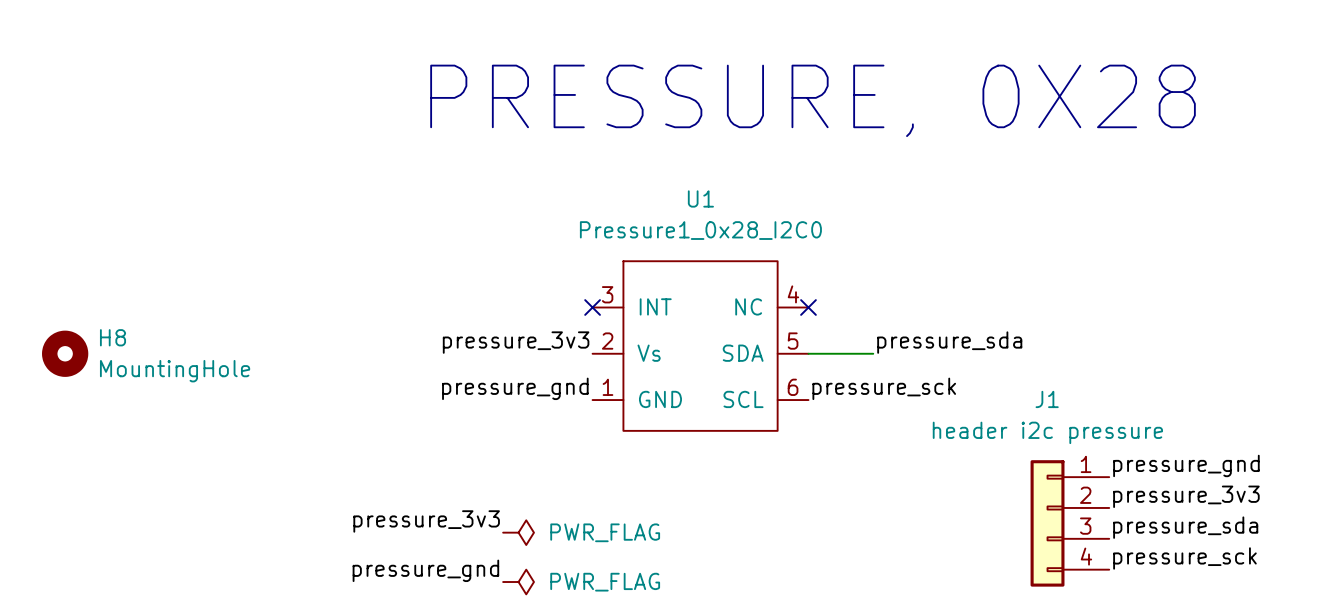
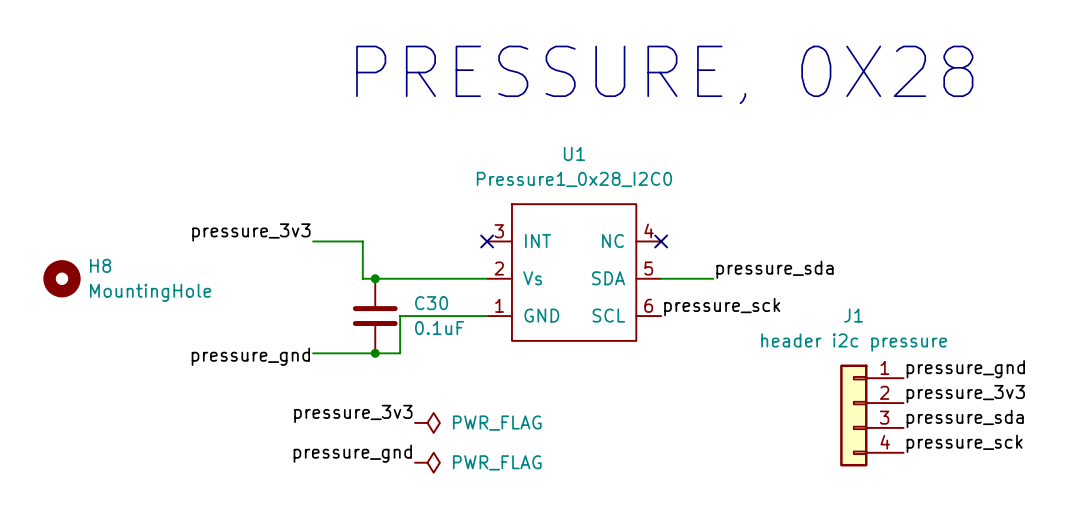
wire: none -> (313, 241) (362, 241) (362, 278) (487, 278)
label position: pressure_3v3 (516, 342) -> pressure_3v3 (251, 232)
junction: none -> (375, 278)
label position: pressure_gnd (515, 388) -> pressure_gnd (250, 356)
C30: none -> 0.1uF (375, 316)
wire: none -> (487, 316) (400, 316) (400, 353) (313, 353)
junction: none -> (375, 353)

